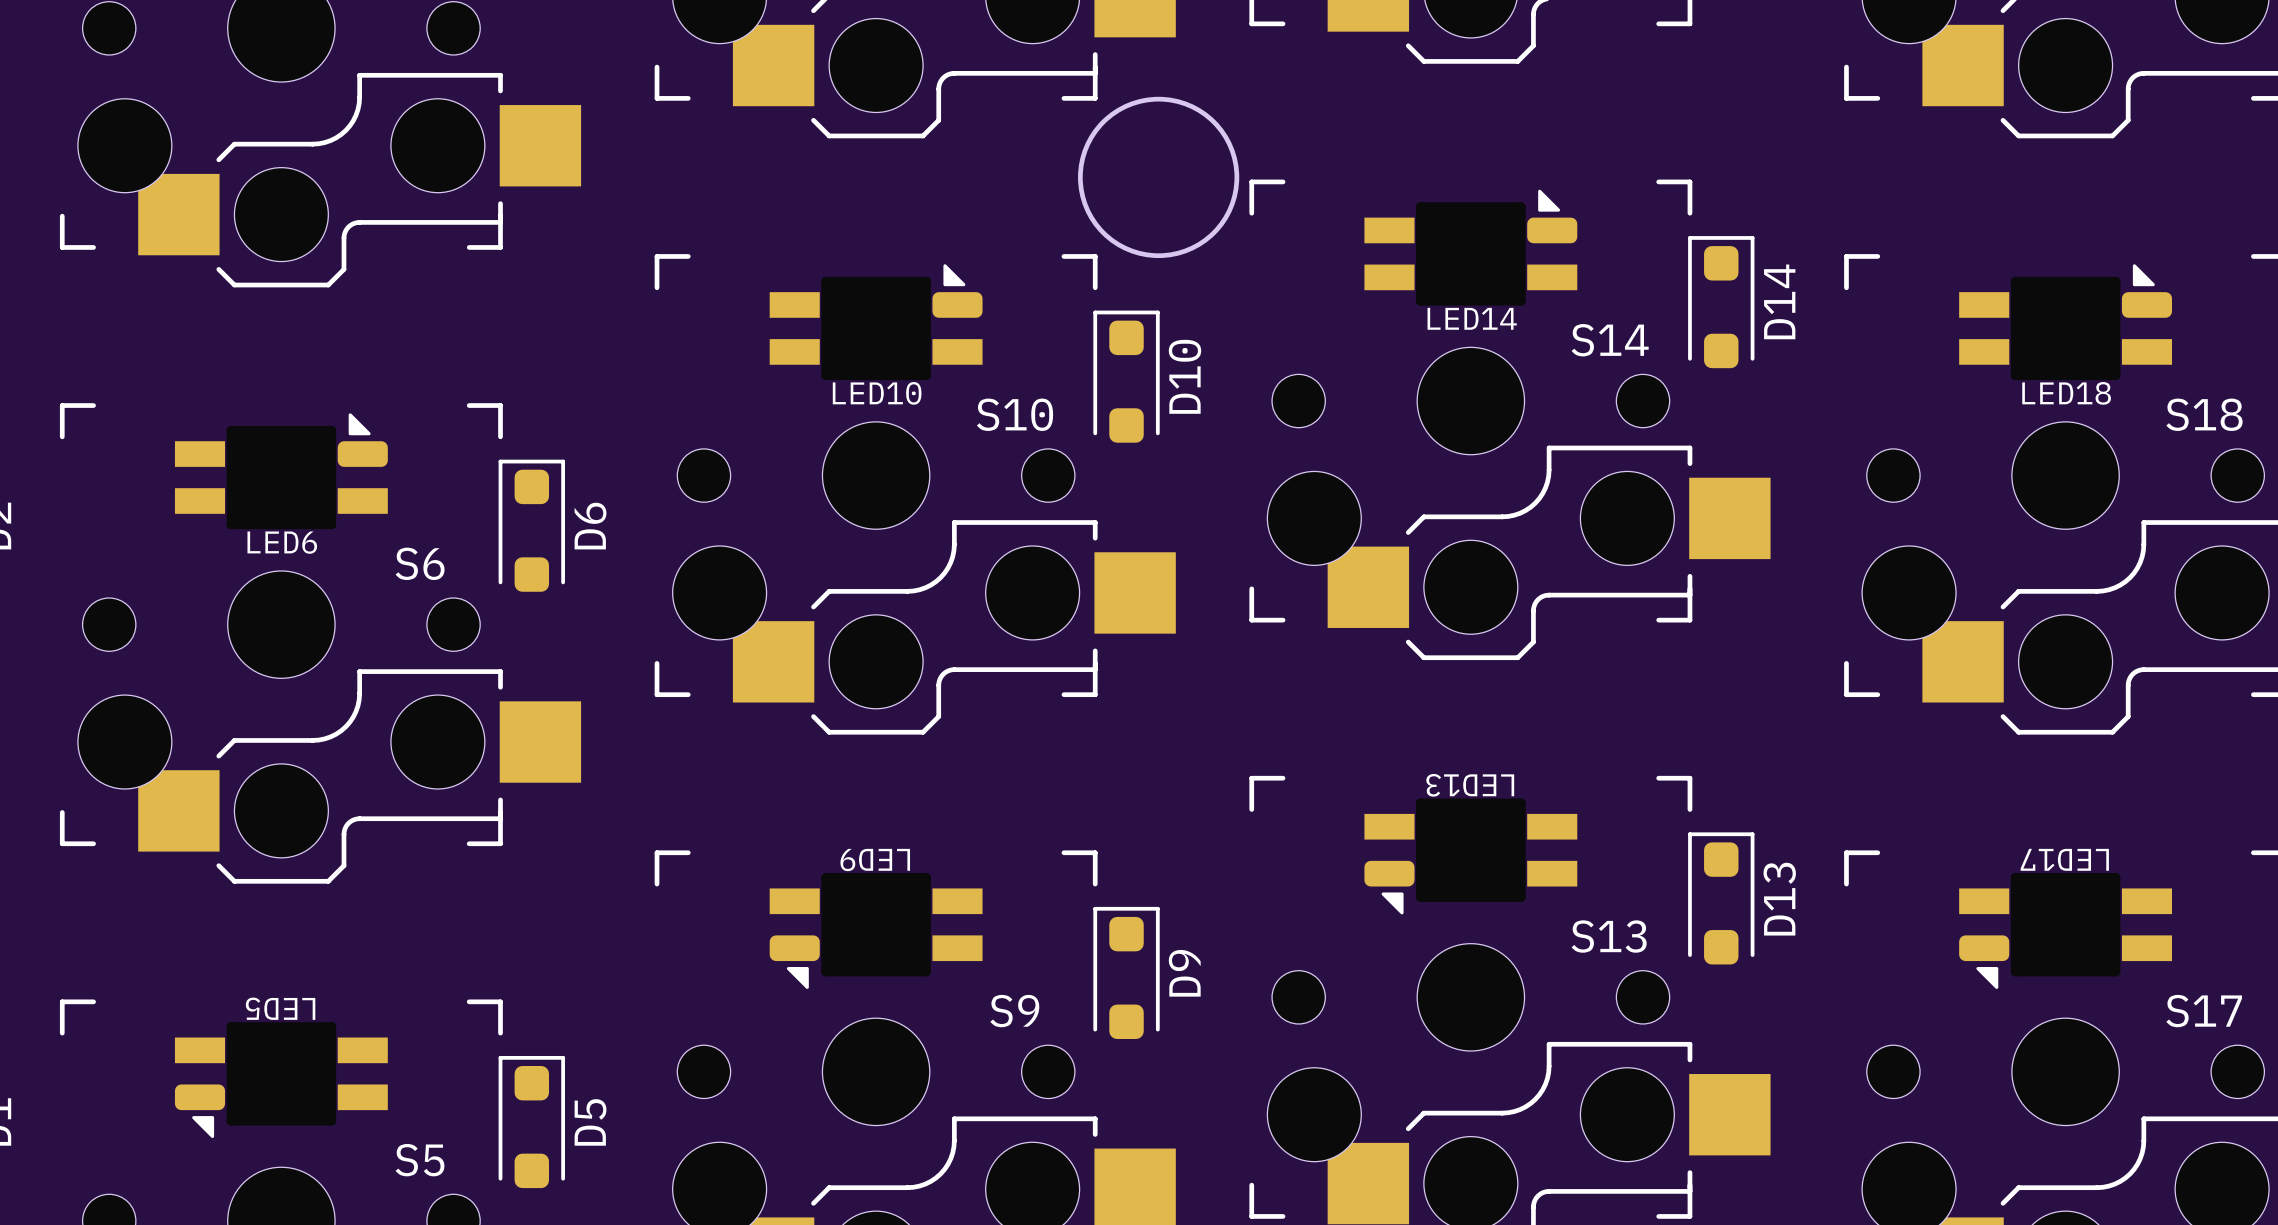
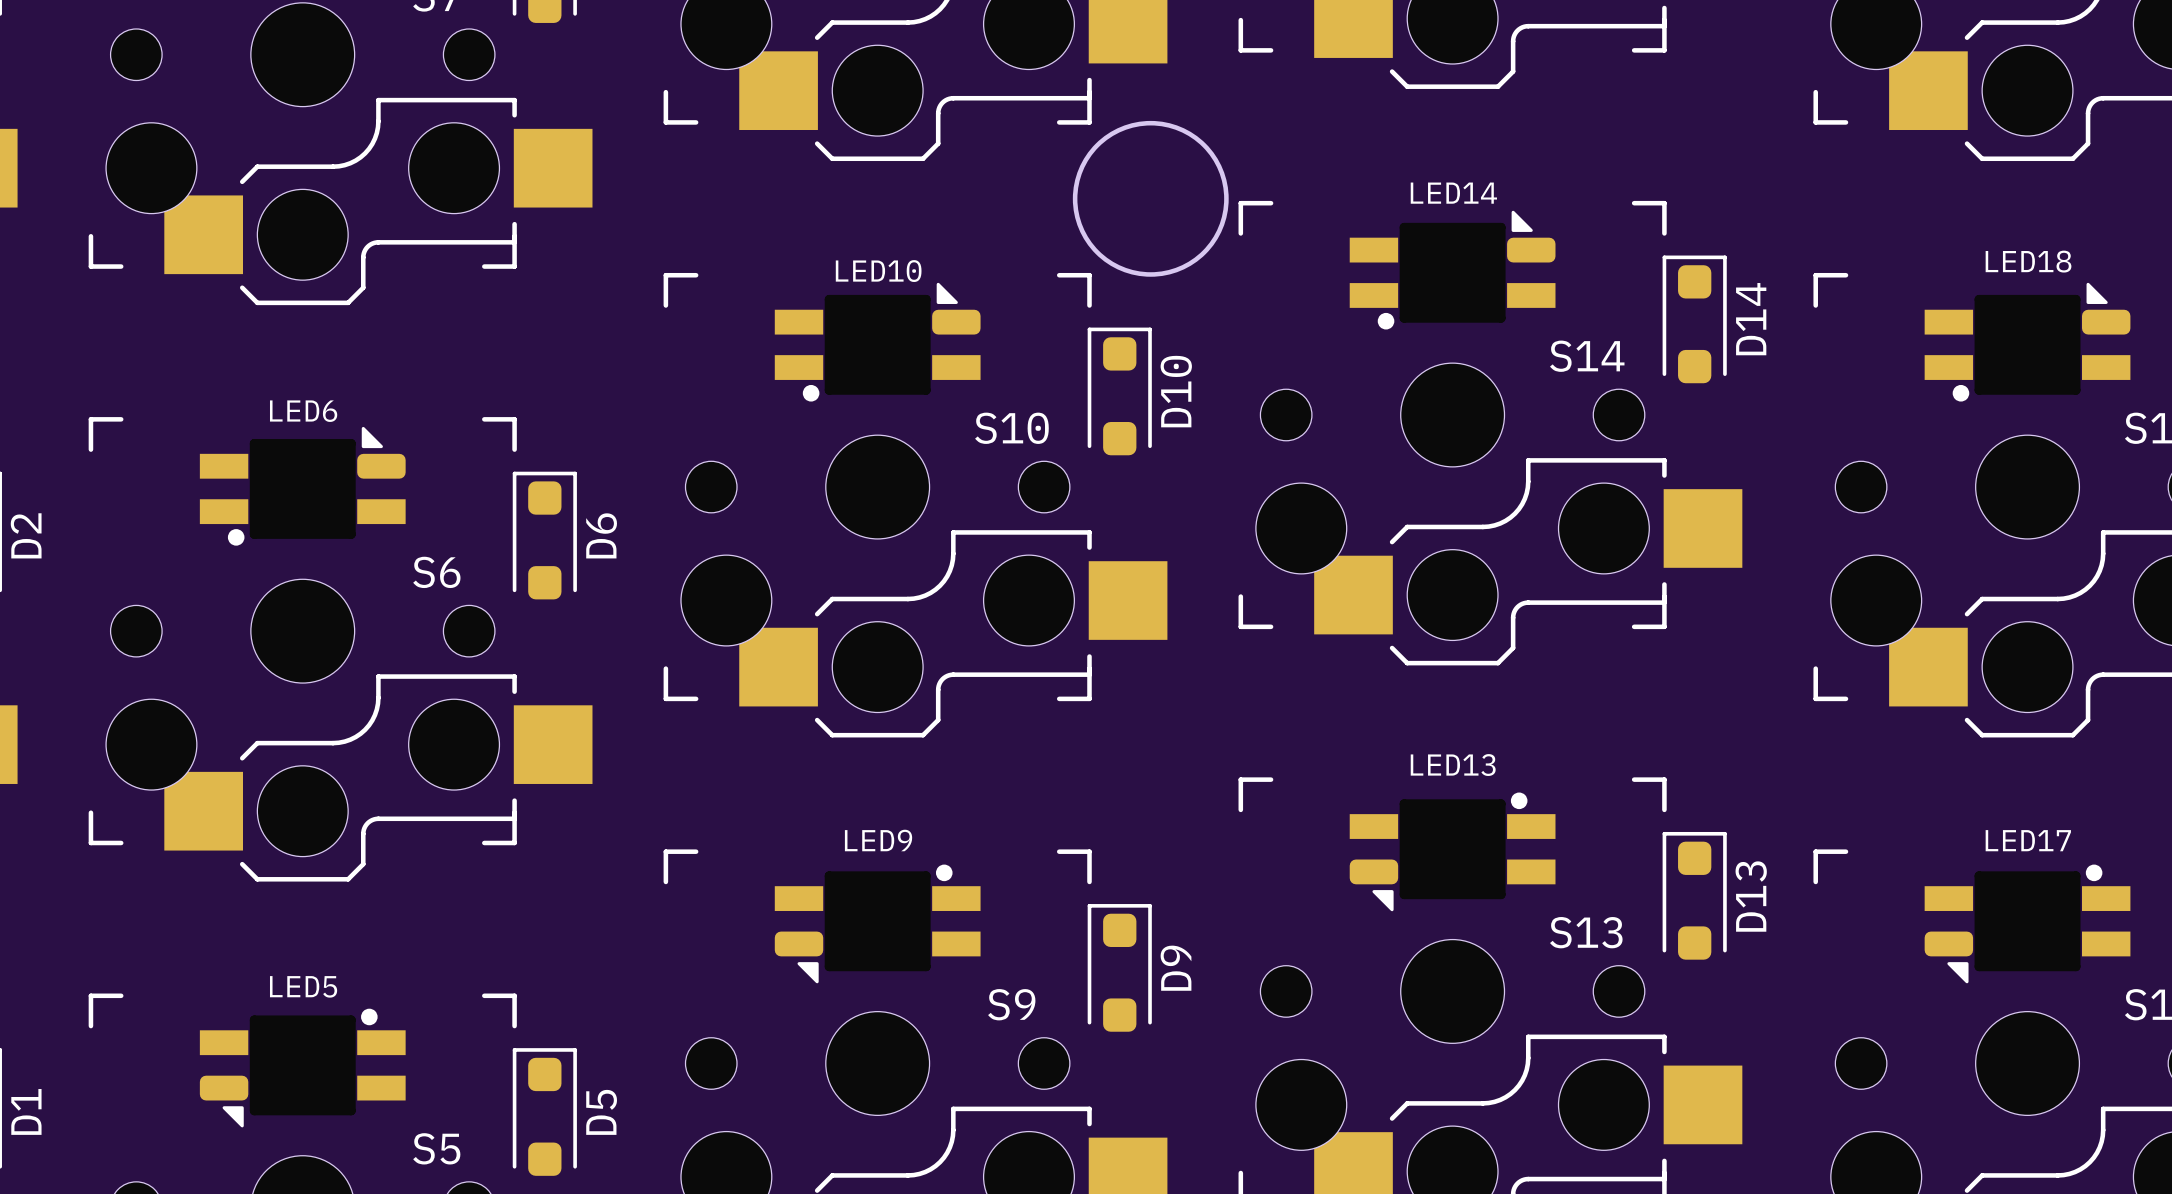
LED14 footprint: [1364, 189, 1578, 306] -> [1349, 210, 1556, 330]
LED10 footprint: [769, 264, 983, 381] -> [774, 282, 981, 402]
LED18 footprint: [1959, 264, 2173, 381] -> [1924, 282, 2131, 402]
LED14 name position: LED14 (1472, 318) -> LED14 (1453, 193)
LED10 name position: LED10 (877, 393) -> LED10 (878, 271)
LED18 name position: LED18 (2066, 393) -> LED18 (2028, 261)
LED6 footprint: [174, 413, 388, 530] -> [199, 426, 406, 546]
LED6 name position: LED6 (282, 542) -> LED6 (303, 411)
LED13 footprint: [1364, 798, 1578, 915] -> [1349, 792, 1556, 912]
LED9 footprint: [769, 873, 983, 989] -> [774, 864, 981, 984]
LED17 footprint: [1959, 873, 2173, 989] -> [1924, 864, 2131, 984]
LED5 footprint: [174, 1022, 388, 1138] -> [199, 1008, 406, 1128]

